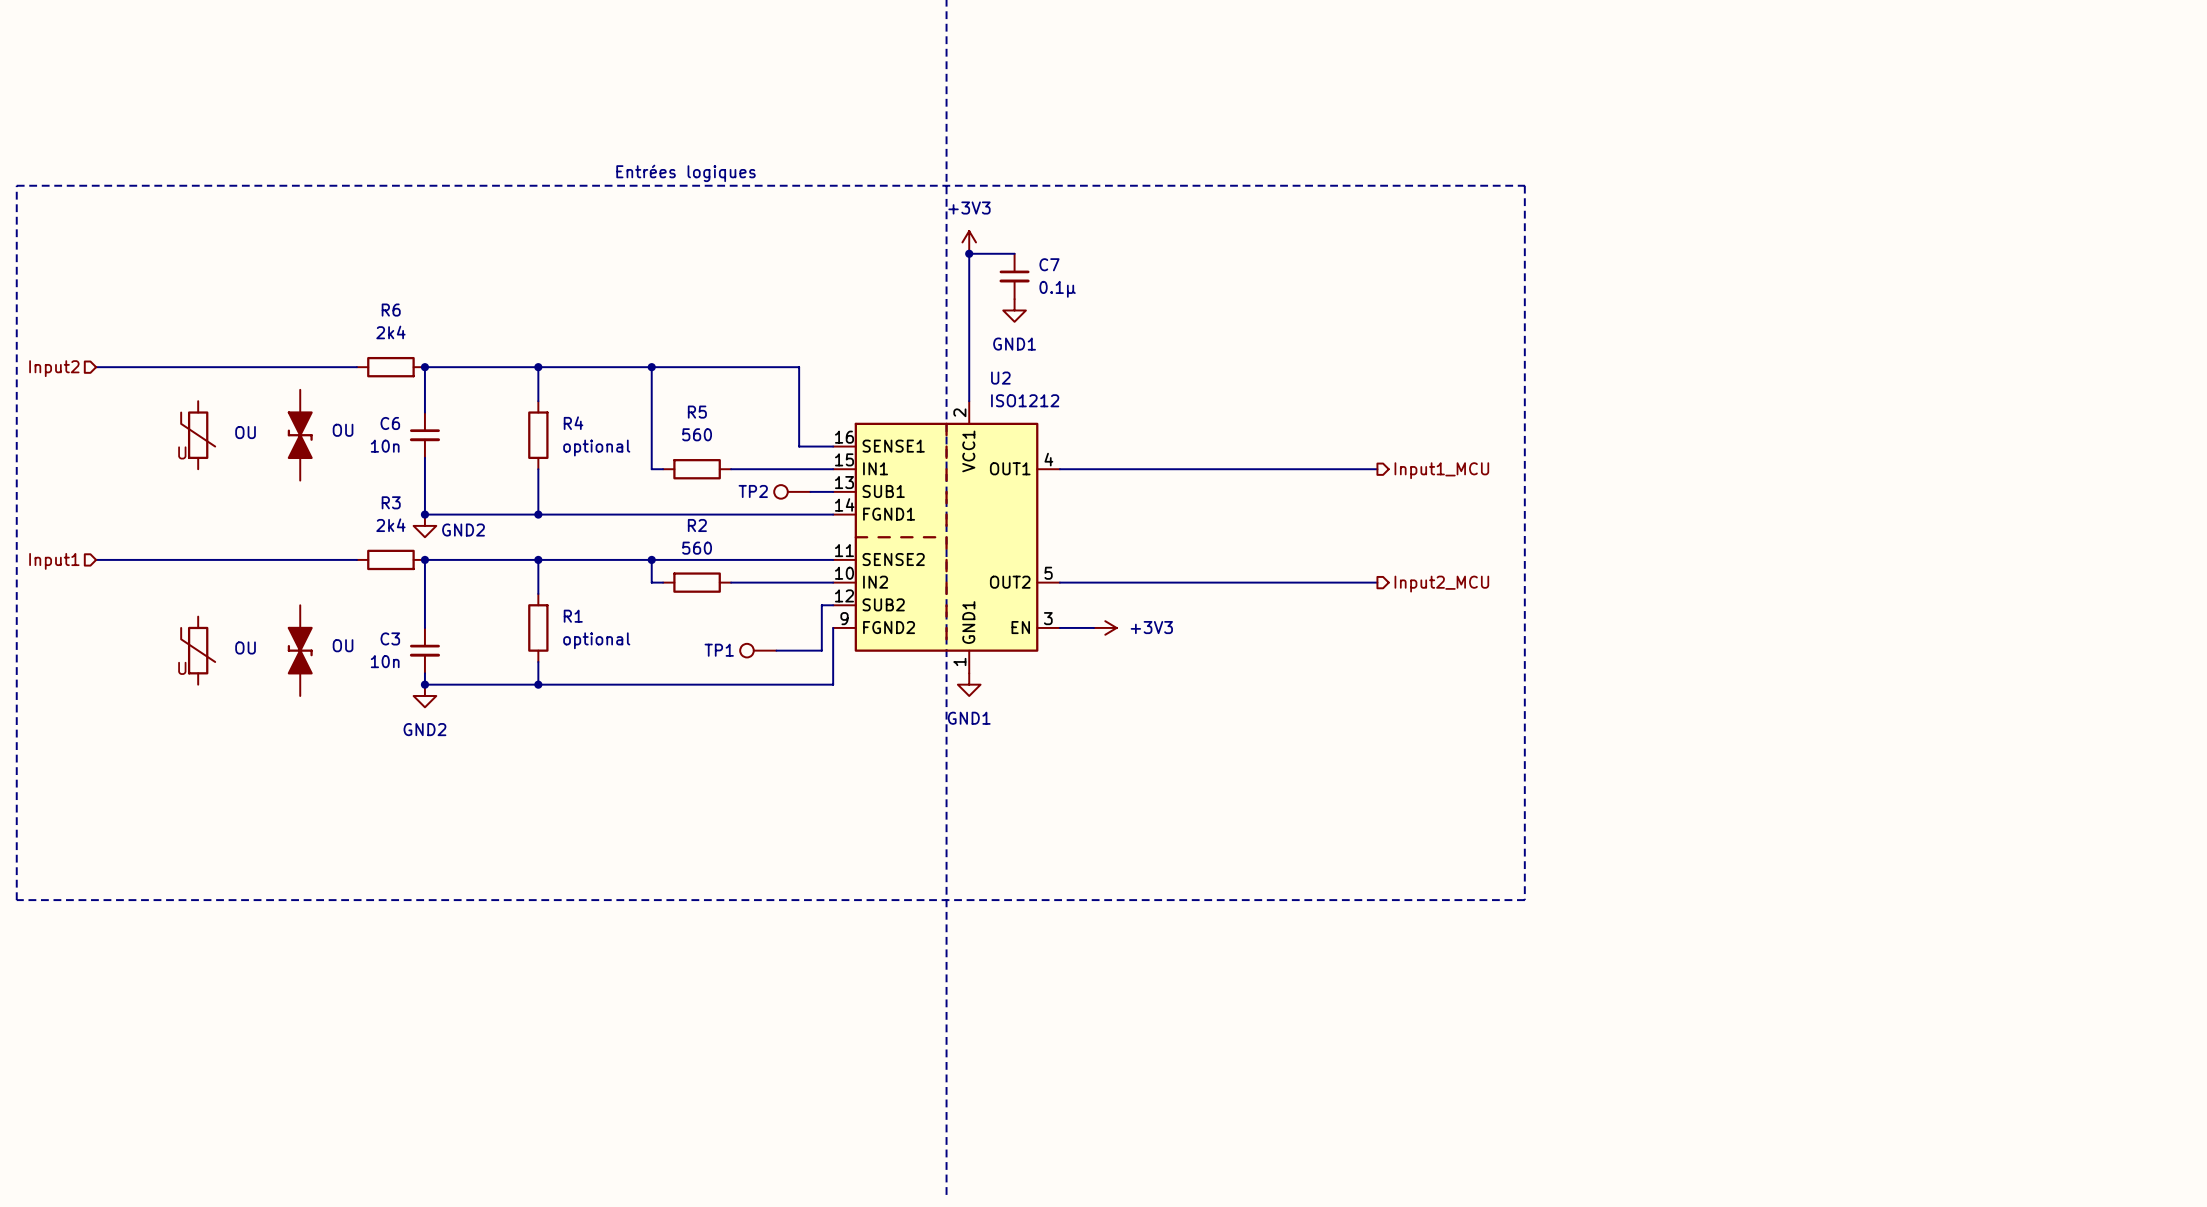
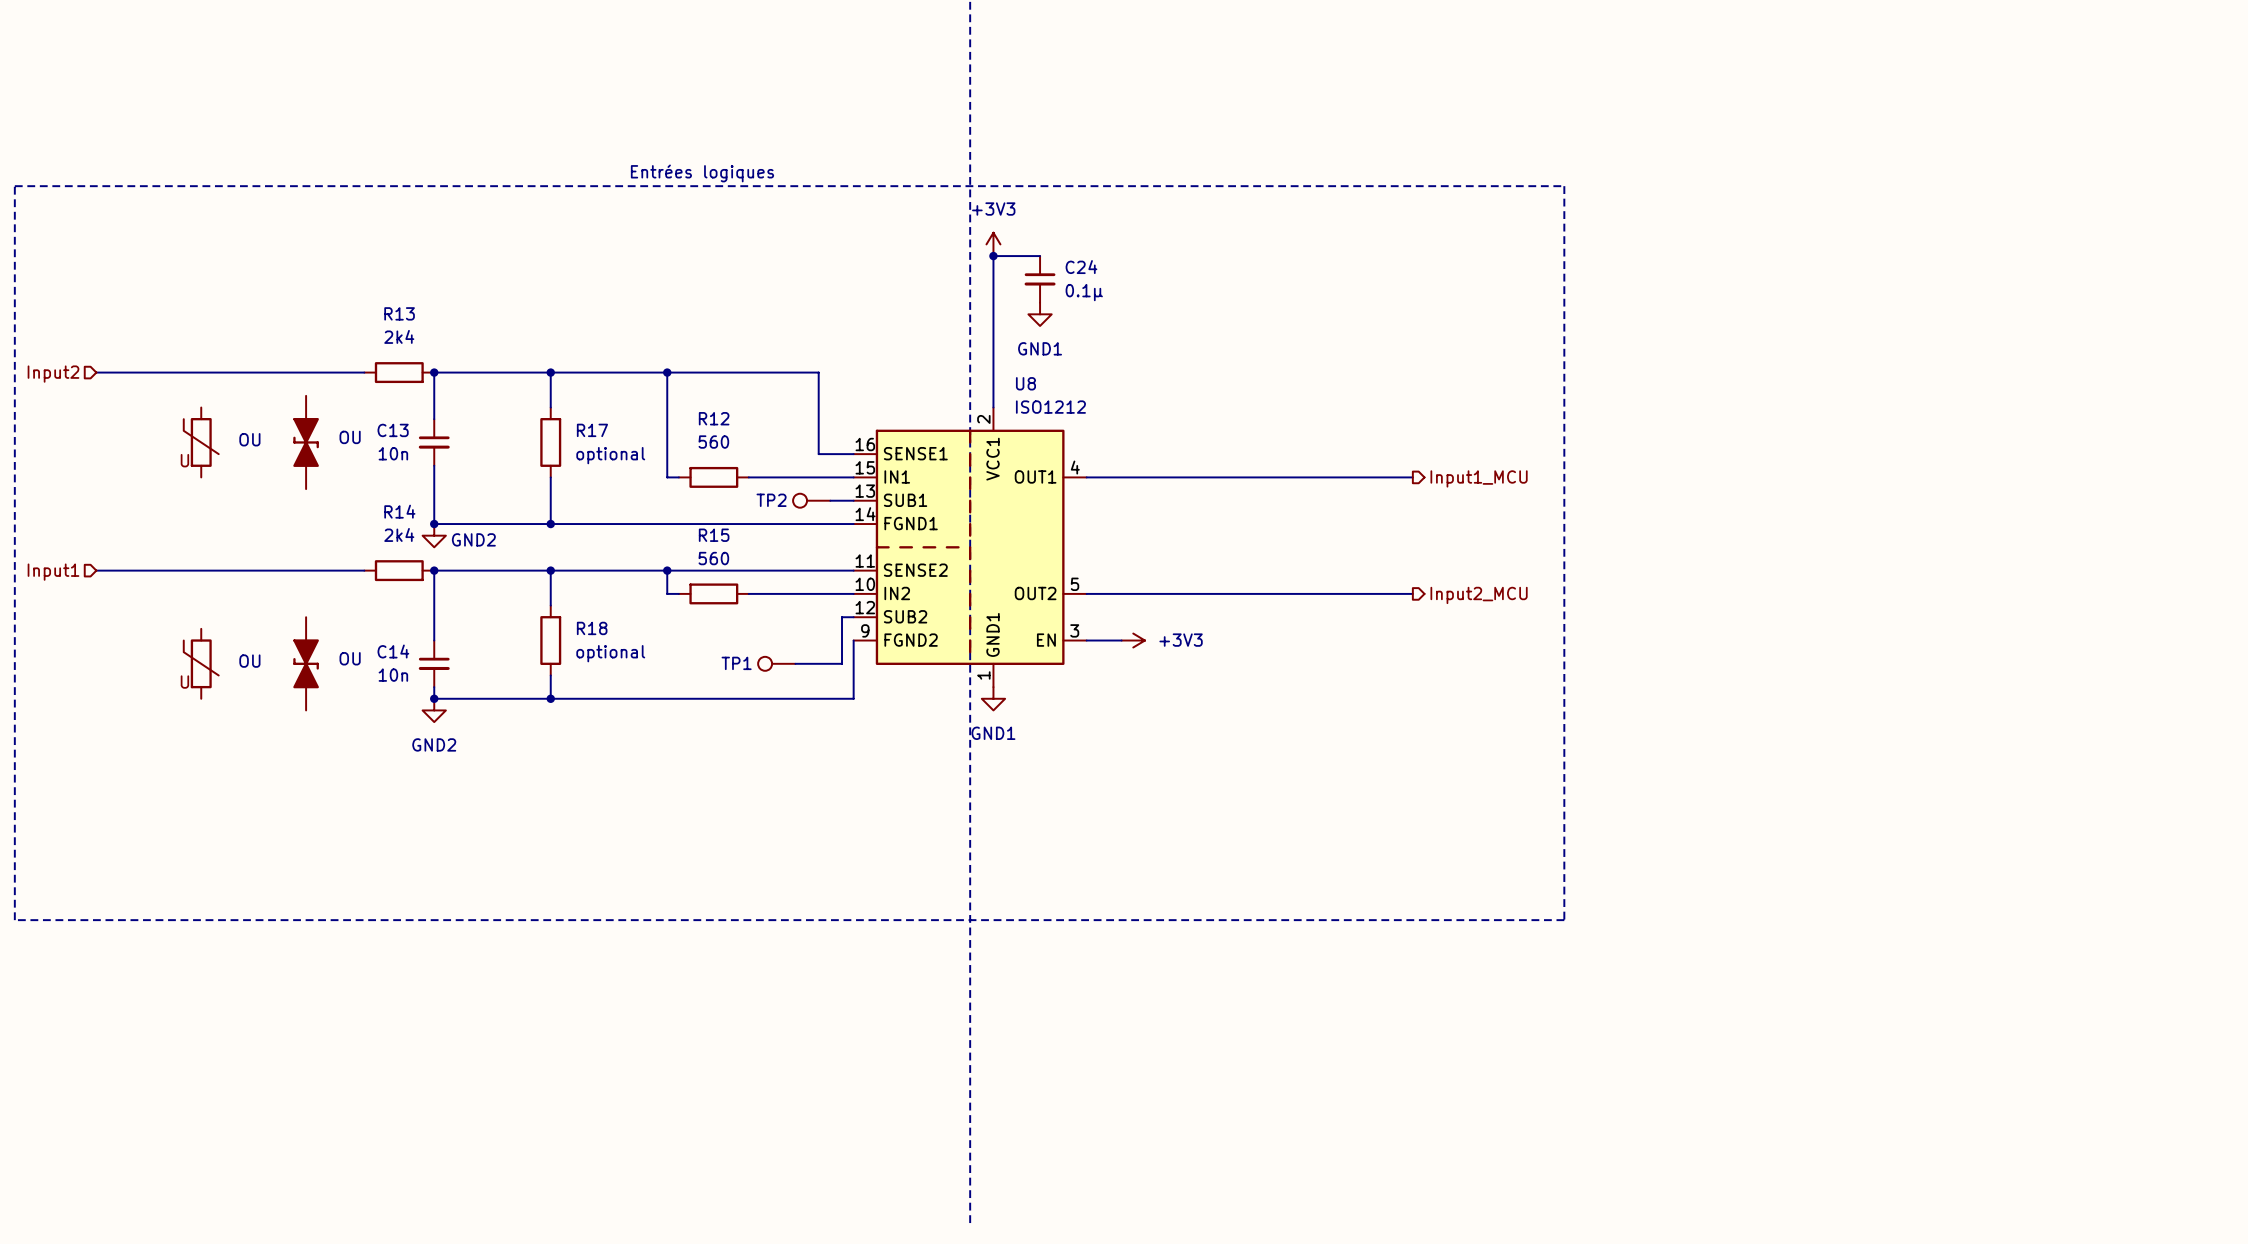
C7 name: C7 (1049, 264) -> C24 (1081, 267)
R6 name: R6 (391, 310) -> R13 (399, 313)
U2 name: U2 (1000, 378) -> U8 (1025, 383)
R5 name: R5 (697, 412) -> R12 (714, 418)
C6 name: C6 (390, 423) -> C13 (393, 430)
R4 name: R4 (573, 423) -> R17 (592, 430)
R3 name: R3 (391, 502) -> R14 (399, 511)
R2 name: R2 (697, 525) -> R15 (714, 535)
R1 name: R1 (573, 616) -> R18 (592, 628)
C3 name: C3 (390, 638) -> C14 (393, 651)

